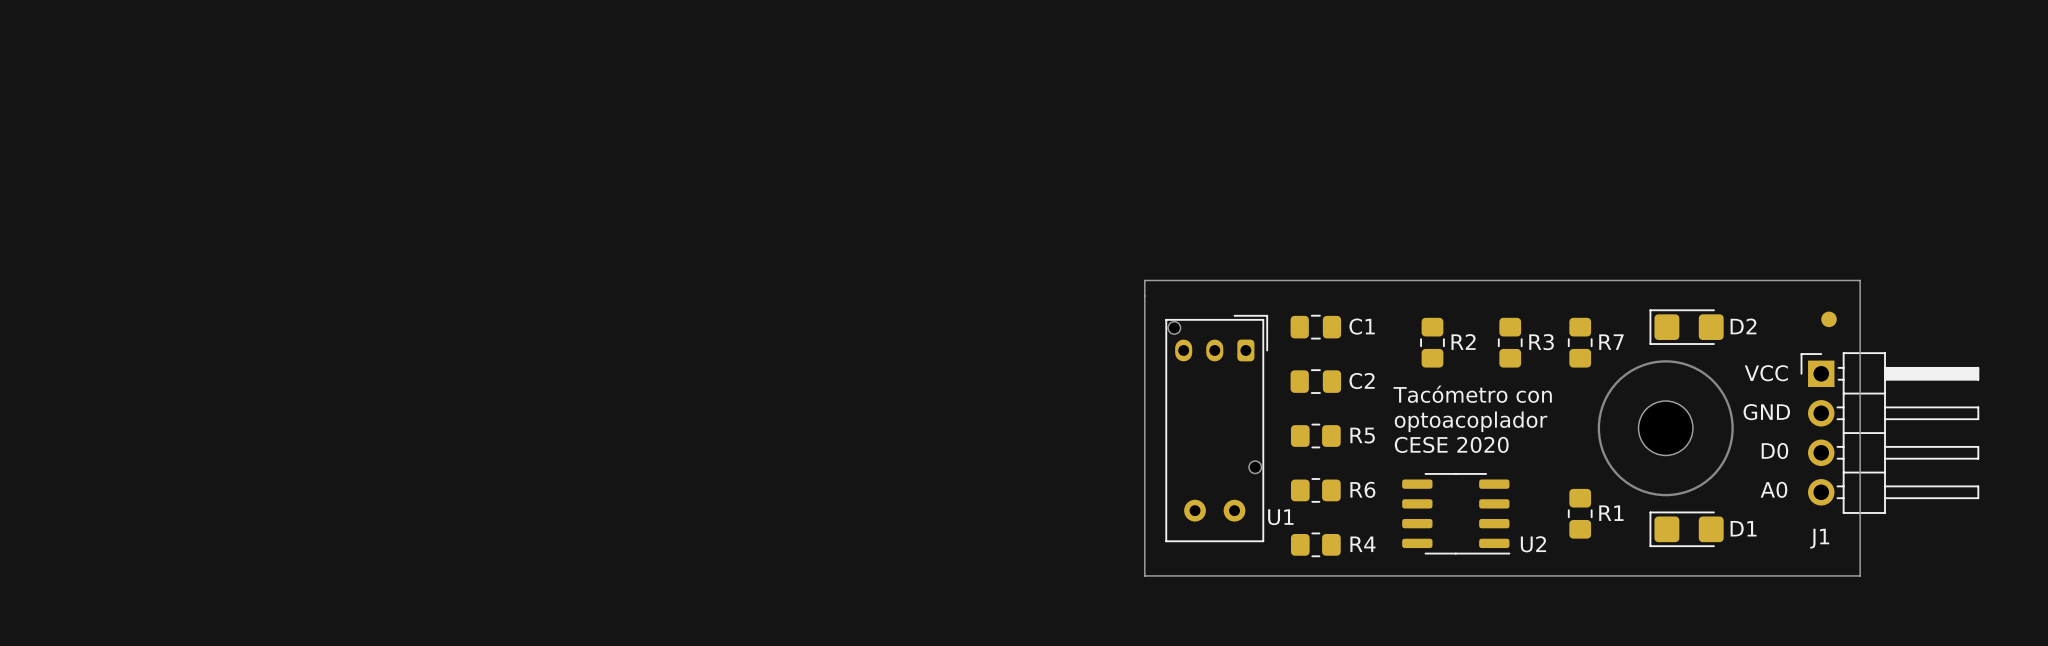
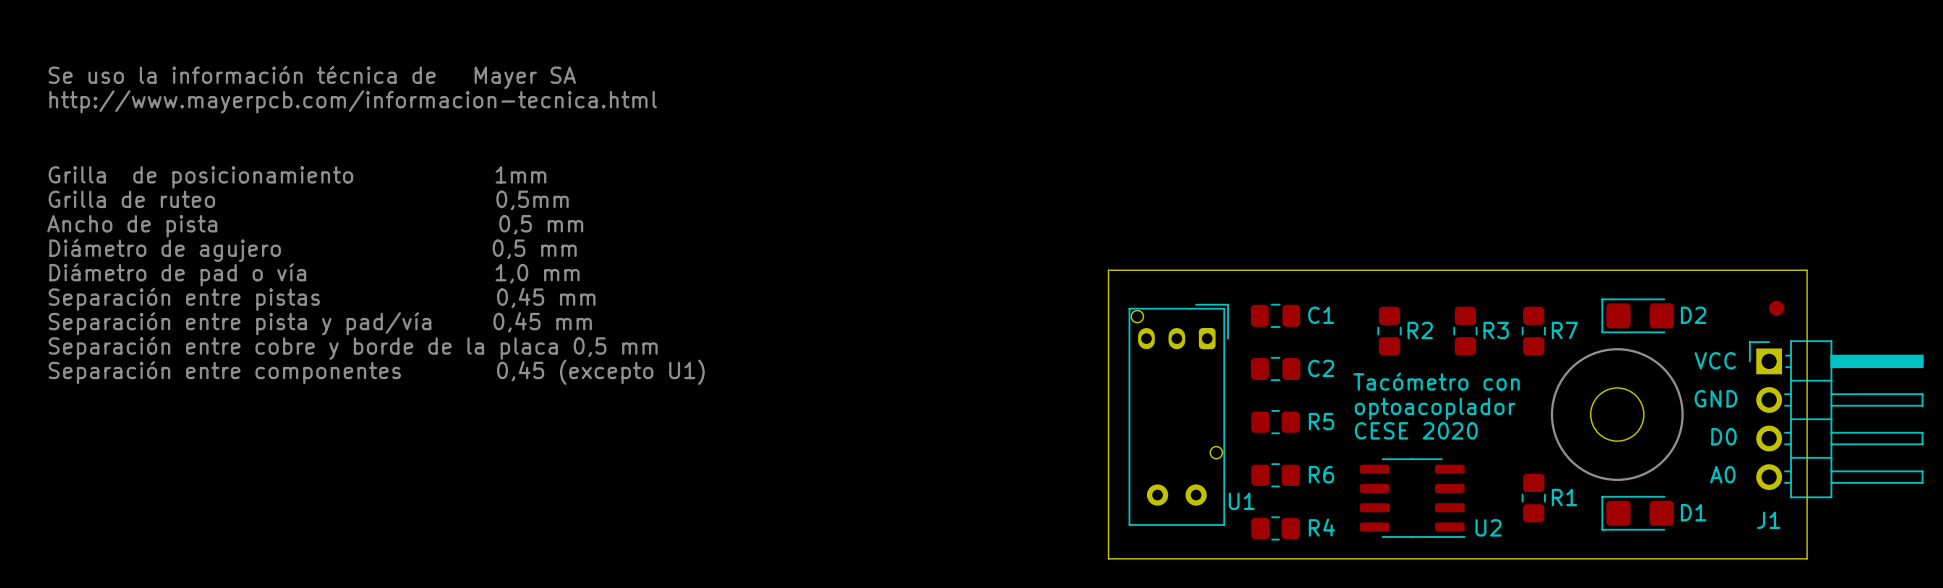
text: none -> Se uso la información técnica de Mayer SA (312, 77)
text: none -> http://www.mayerpcb.com/informacion-tecnica.html (353, 101)
text: none -> Grilla de posicionamiento 1mm (297, 177)
text: none -> Grilla de ruteo 0,5mm (308, 200)
text: none -> Ancho de pista 0,5 mm (315, 226)
text: none -> Diámetro de agujero 0,5 mm (313, 250)
text: none -> Diámetro de pad o vía 1,0 mm (314, 274)
text: none -> Separación entre pistas 0,45 mm (322, 299)
text: none -> Separación entre pista y pad/vía 0,45 mm (320, 323)
text: none -> Separación entre cobre y borde de la placa 0,5 mm (353, 348)
text: none -> Separación entre componentes 0,45 (excepto U1) (376, 372)

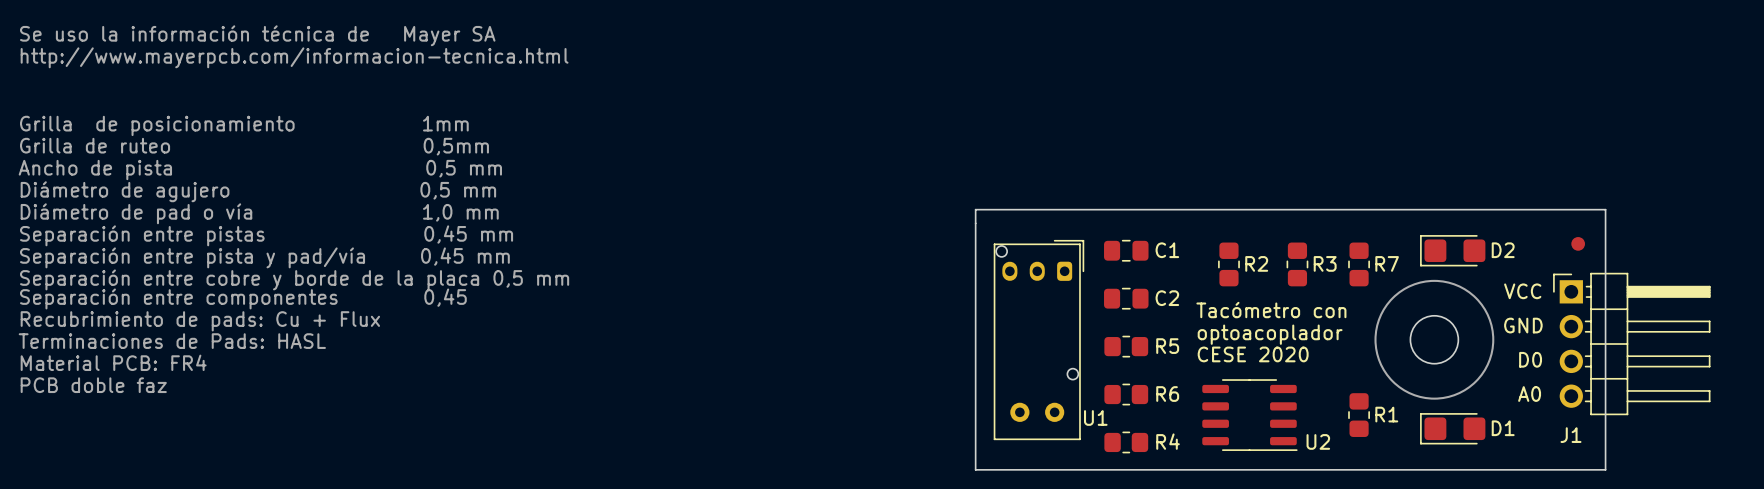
text: Separación entre componentes 0,45 (excepto U1) (376, 372) -> Separación entre componentes 0,45 (243, 298)
text: none -> Recubrimiento de pads: Cu + Flux (200, 321)
text: none -> Terminaciones de Pads: HASL (172, 341)
text: none -> Material PCB: FR4 (113, 362)
text: none -> PCB doble faz (93, 385)

